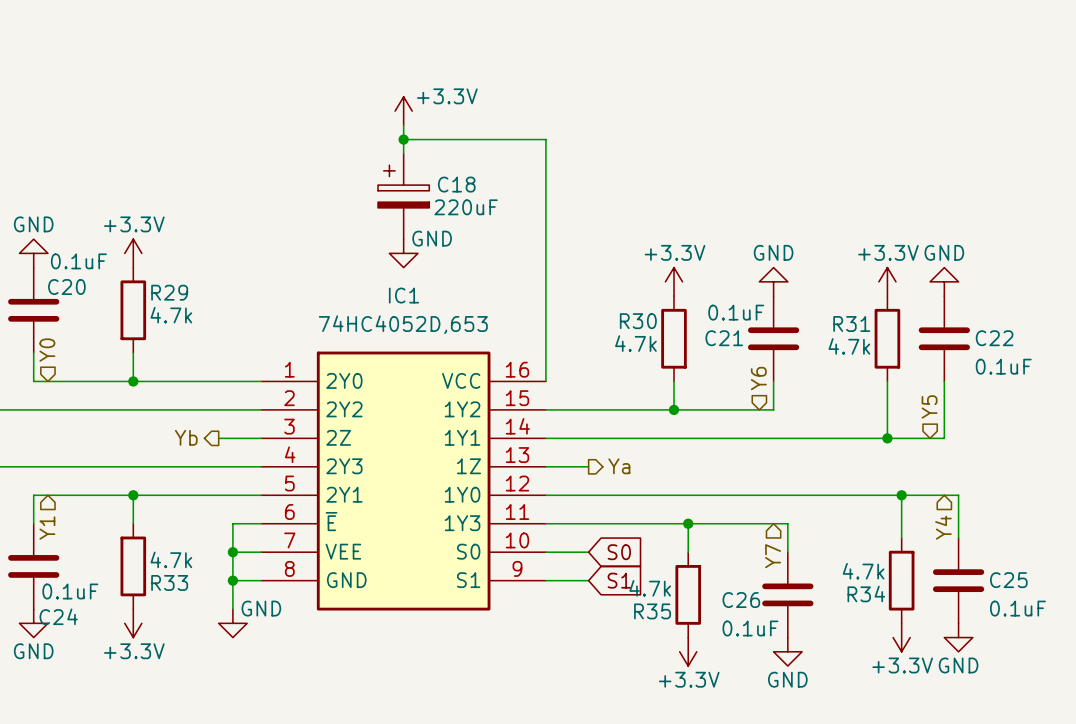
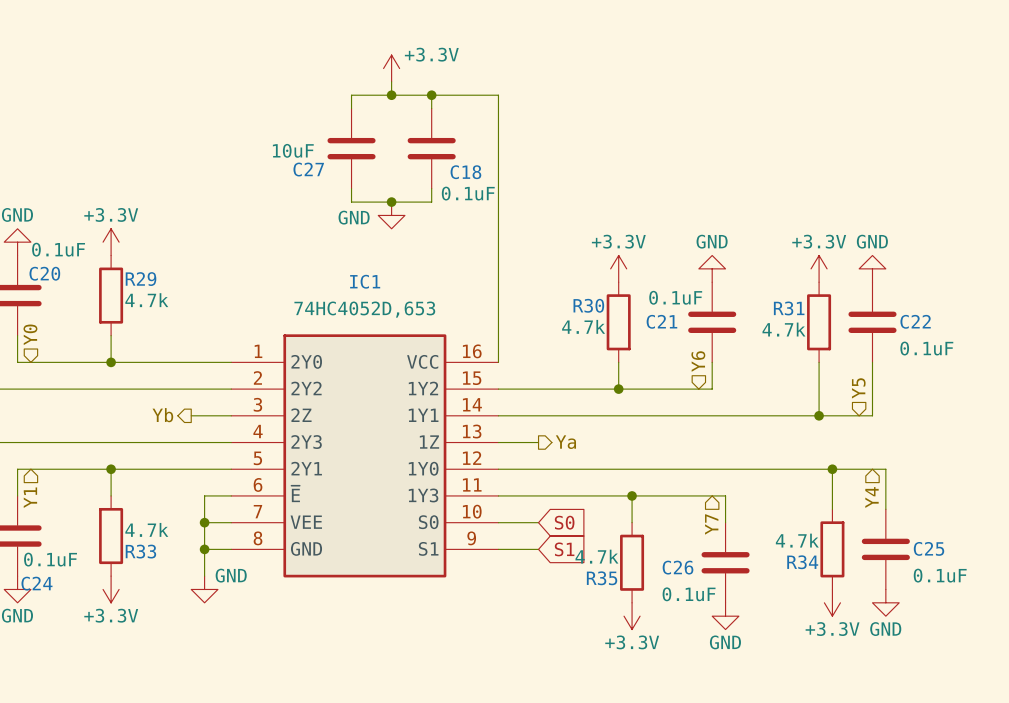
wire: none -> (391, 81) (391, 95)
junction: none -> (391, 95)
wire: none -> (431, 95) (431, 108)
junction: none -> (431, 95)
power symbol position: +3.3V (403, 111) -> +3.3V (391, 68)
wire: (403, 125) (403, 153) -> none
wire: (403, 139) (545, 139) -> (351, 108) (351, 95) (498, 95) (498, 135)
junction: (403, 139) -> none
C18 symbol: [378, 153, 430, 240] -> [407, 108, 456, 189]
C27: none -> 10uF (351, 148)
C18 name position: C18 (456, 184) -> C18 (465, 172)
wire: none -> (351, 188) (351, 202) (431, 202) (431, 188)
C18 value: 220uF (466, 207) -> 0.1uF (468, 193)
junction: none -> (391, 202)
power symbol text position: GND (432, 238) -> GND (354, 217)
power symbol position: GND (403, 253) -> GND (391, 215)

